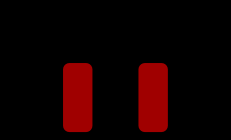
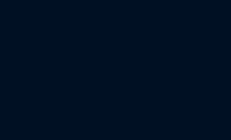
part: (115, 97) -> none

